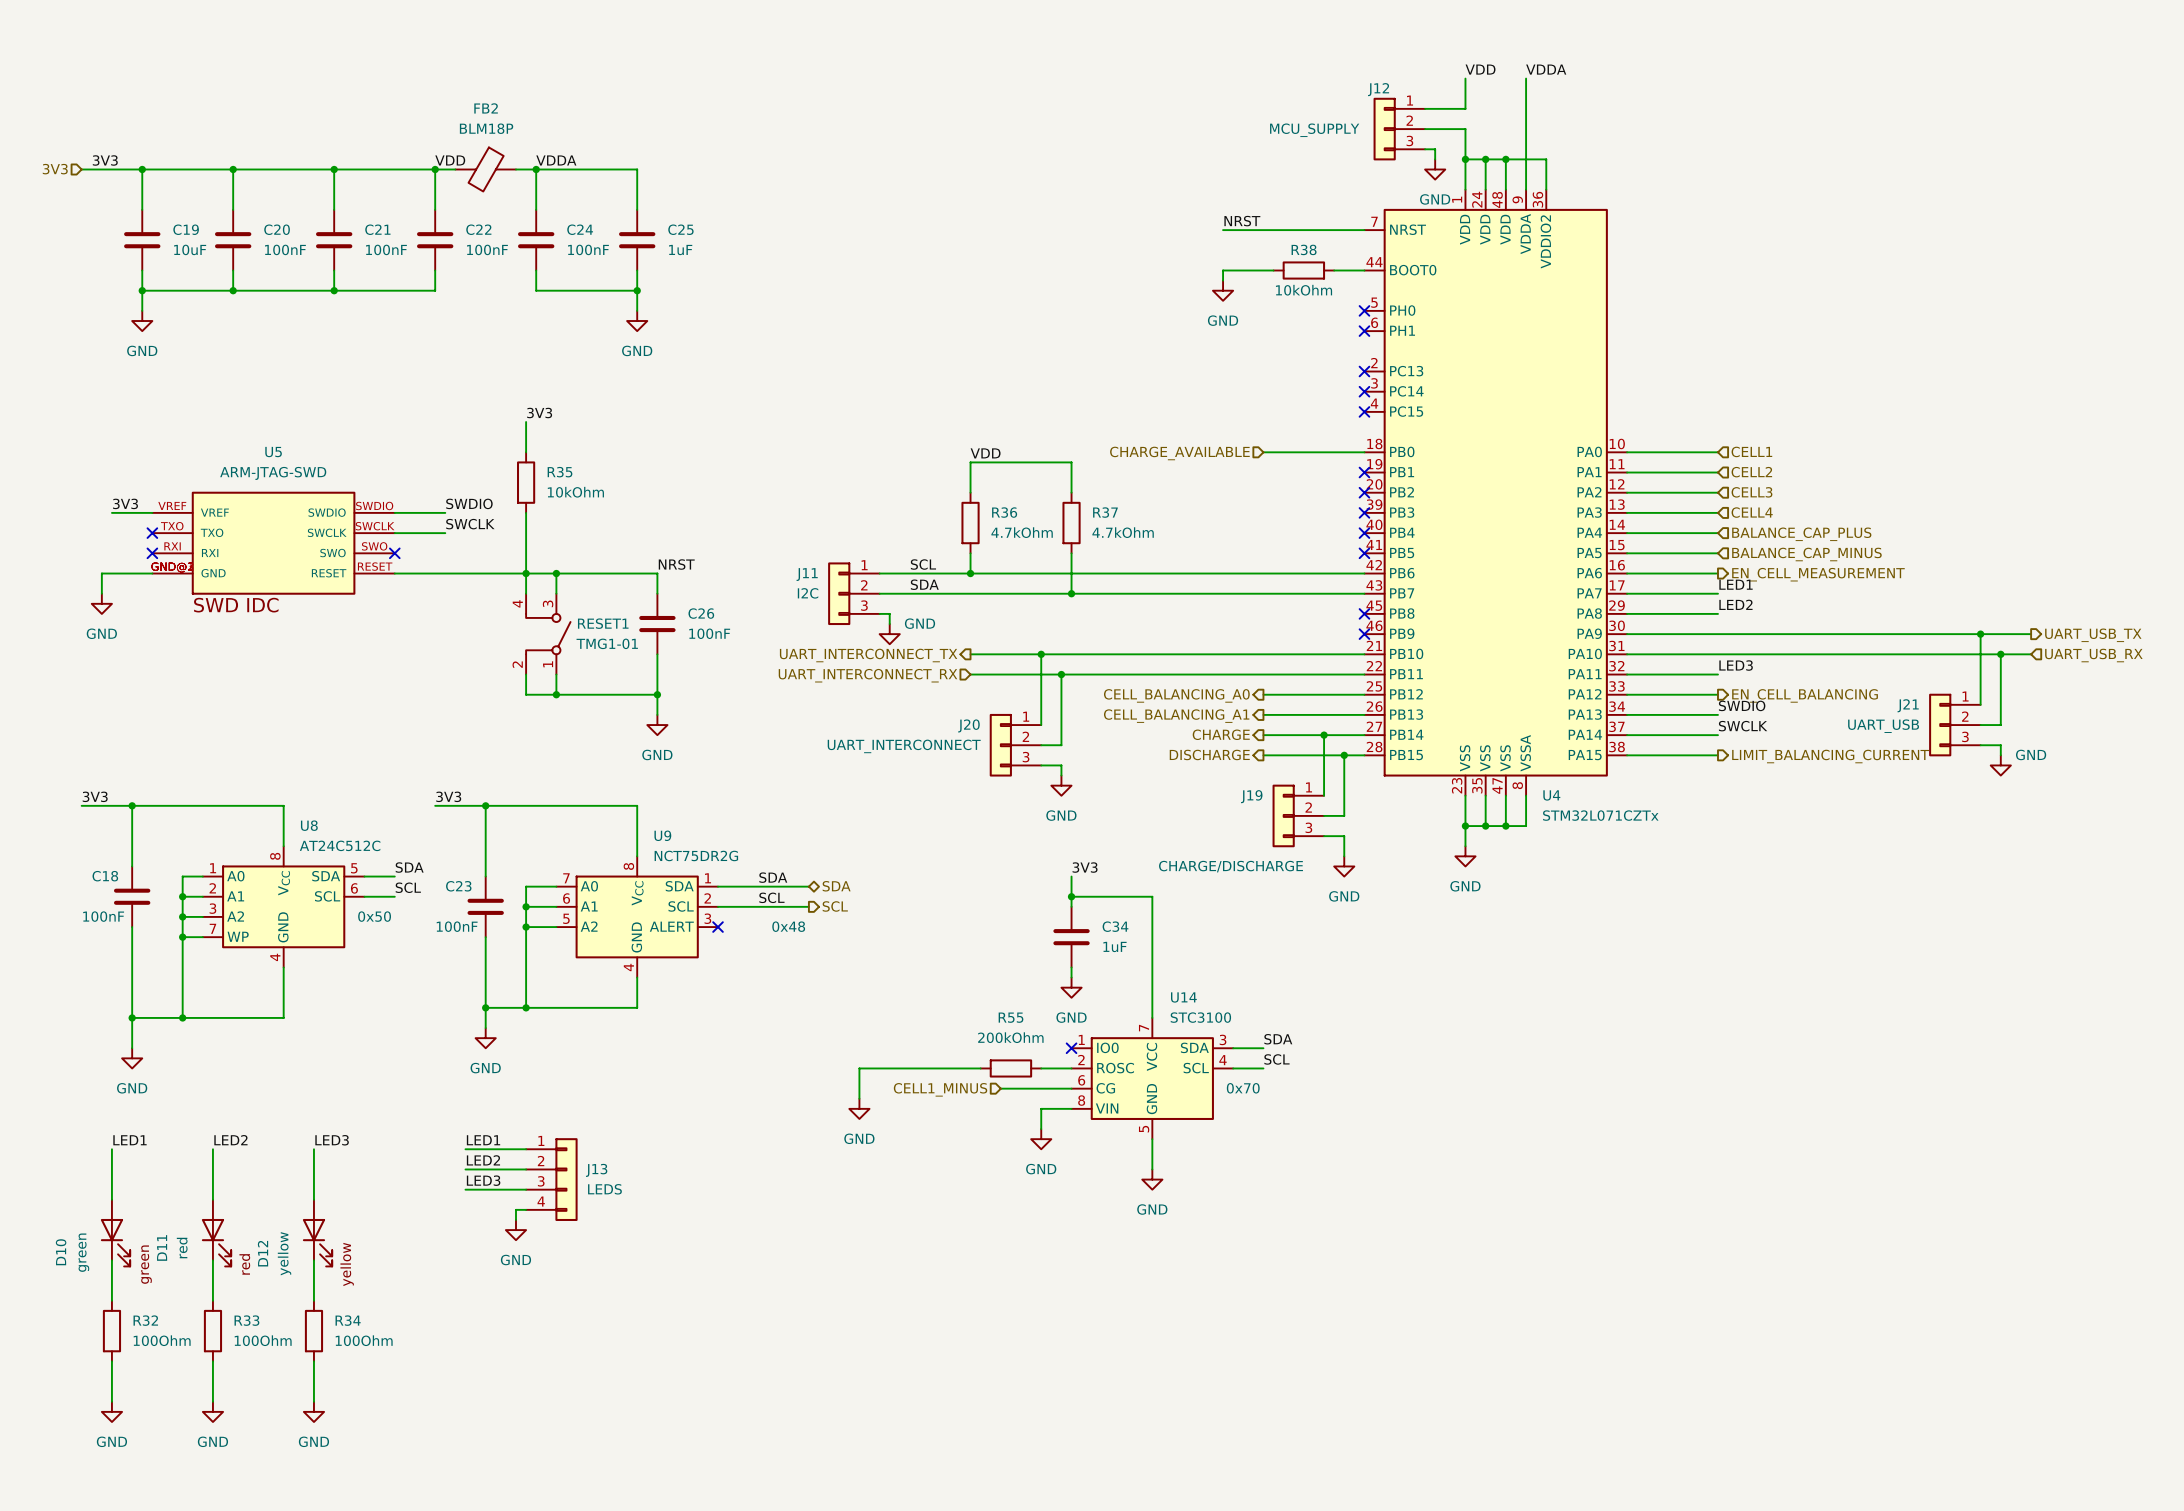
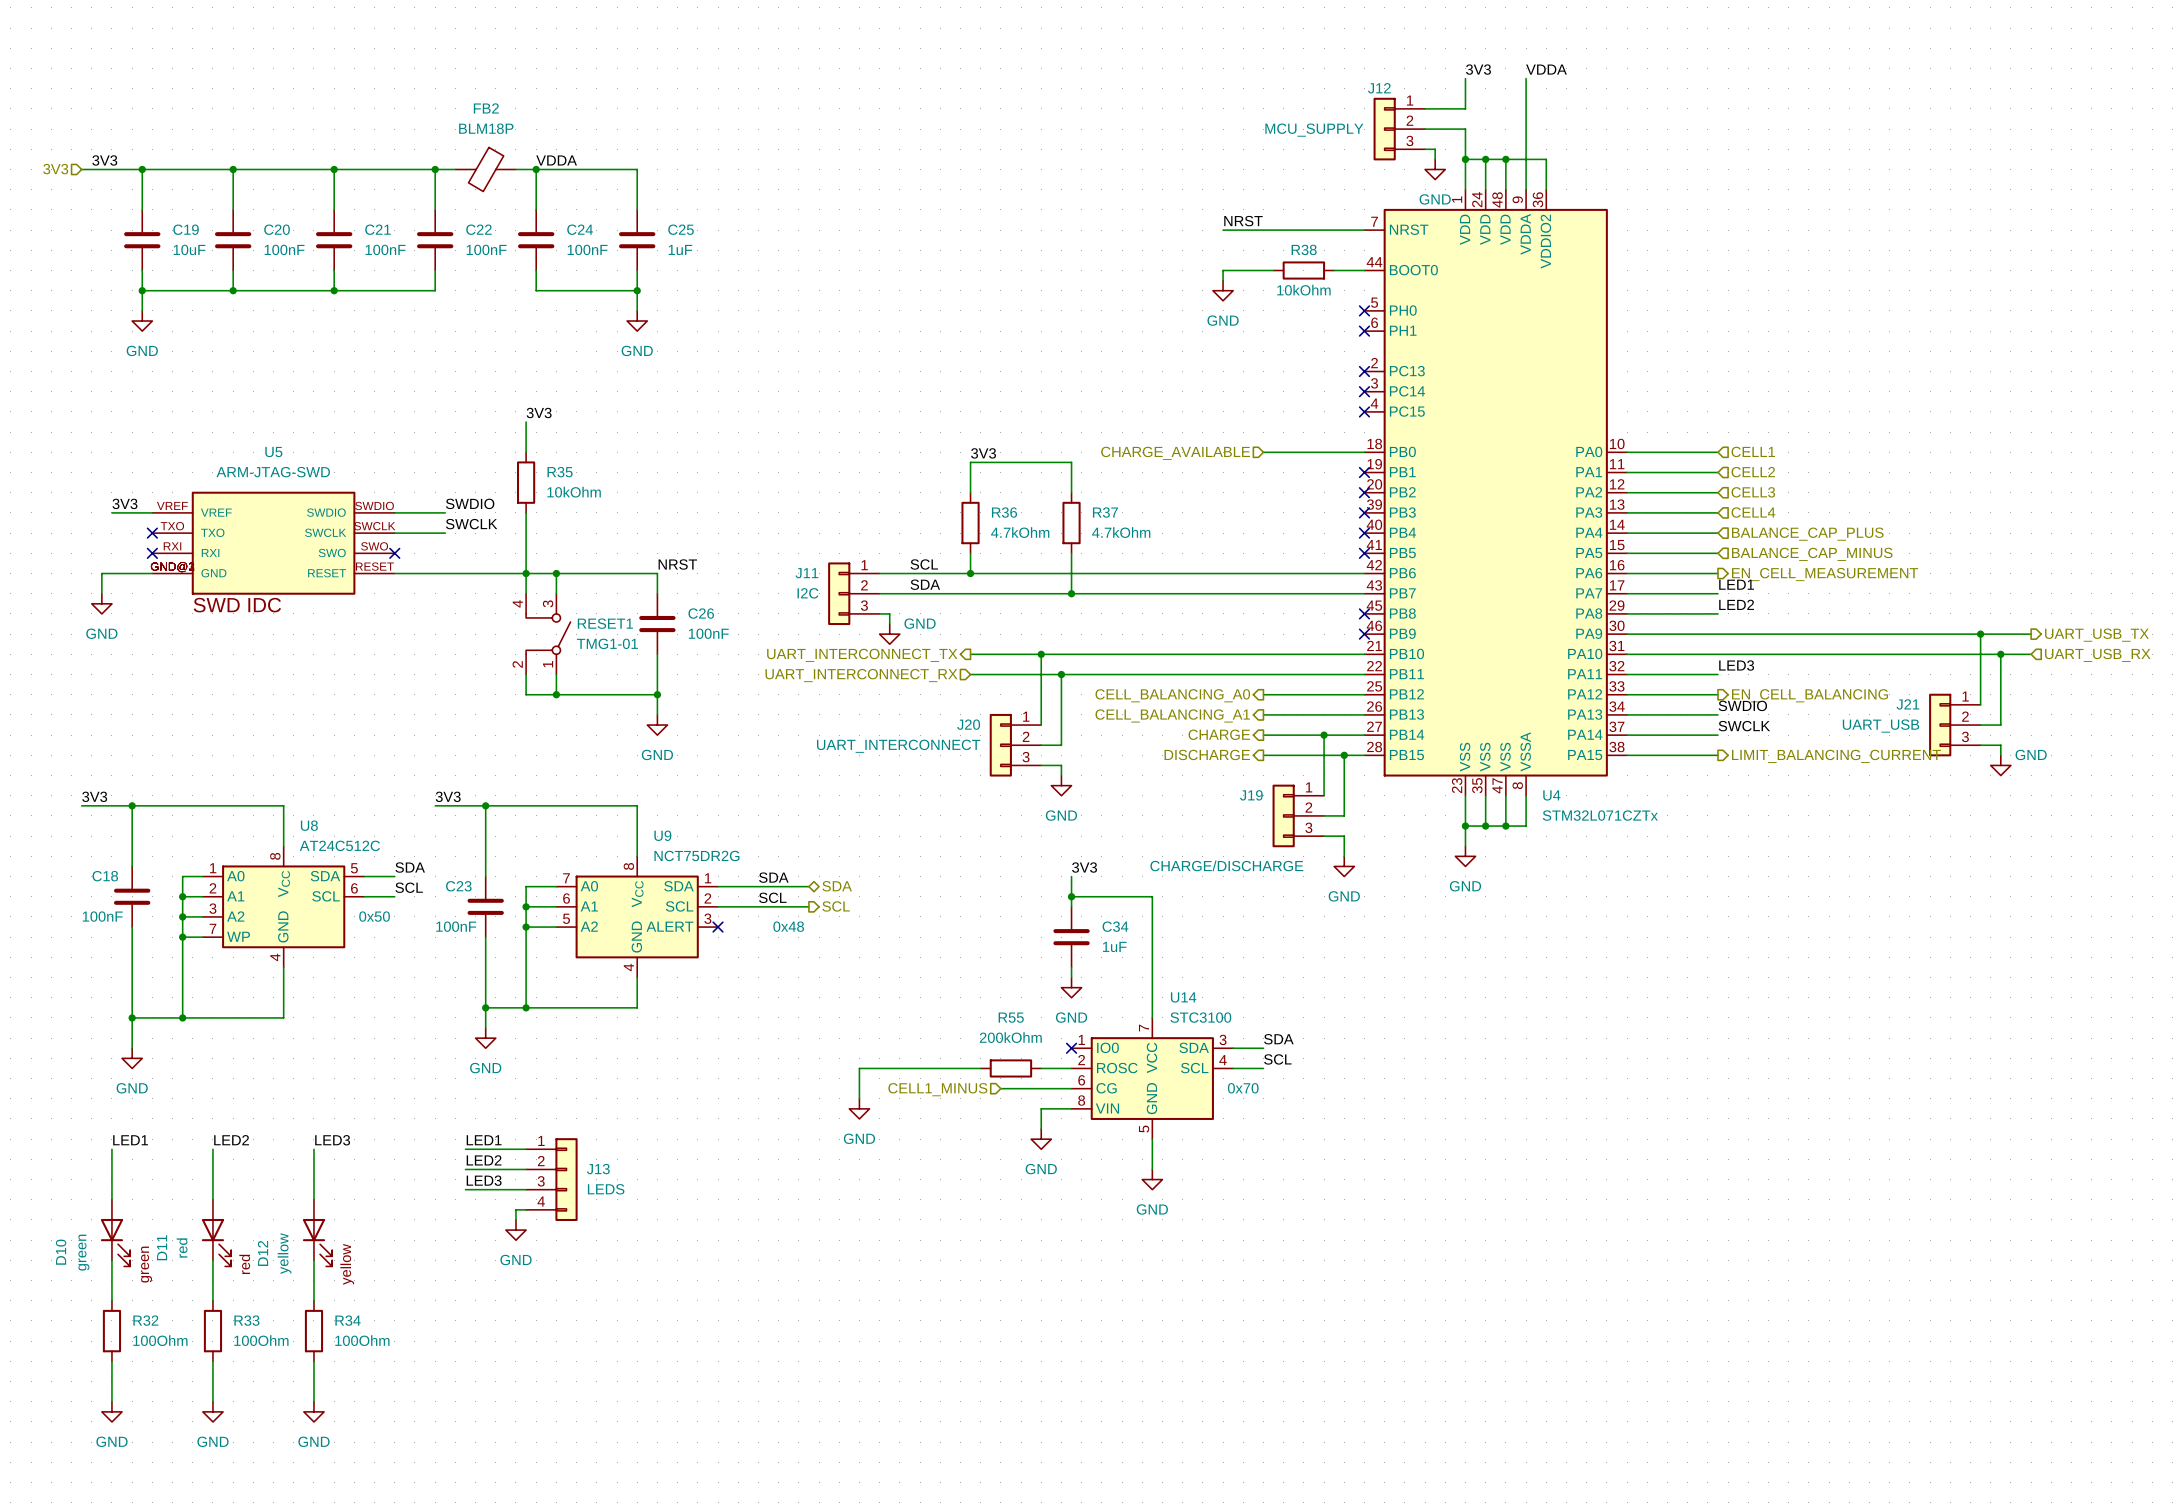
label: VDD (1480, 69) -> 3V3 (1478, 69)
label: VDD (450, 160) -> none
label: VDD (985, 453) -> 3V3 (983, 453)

